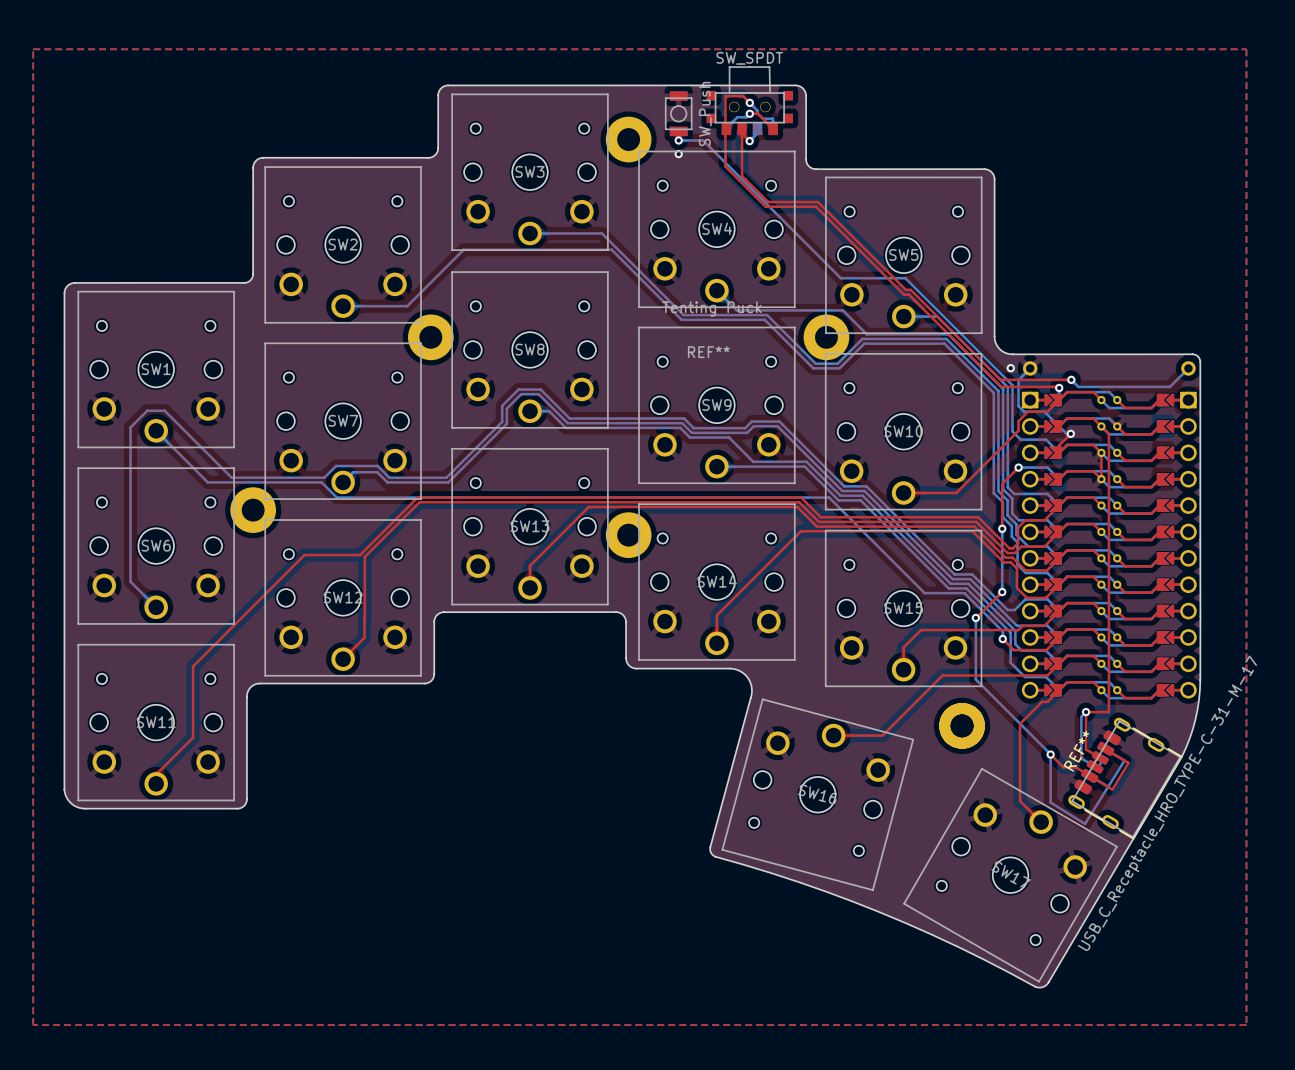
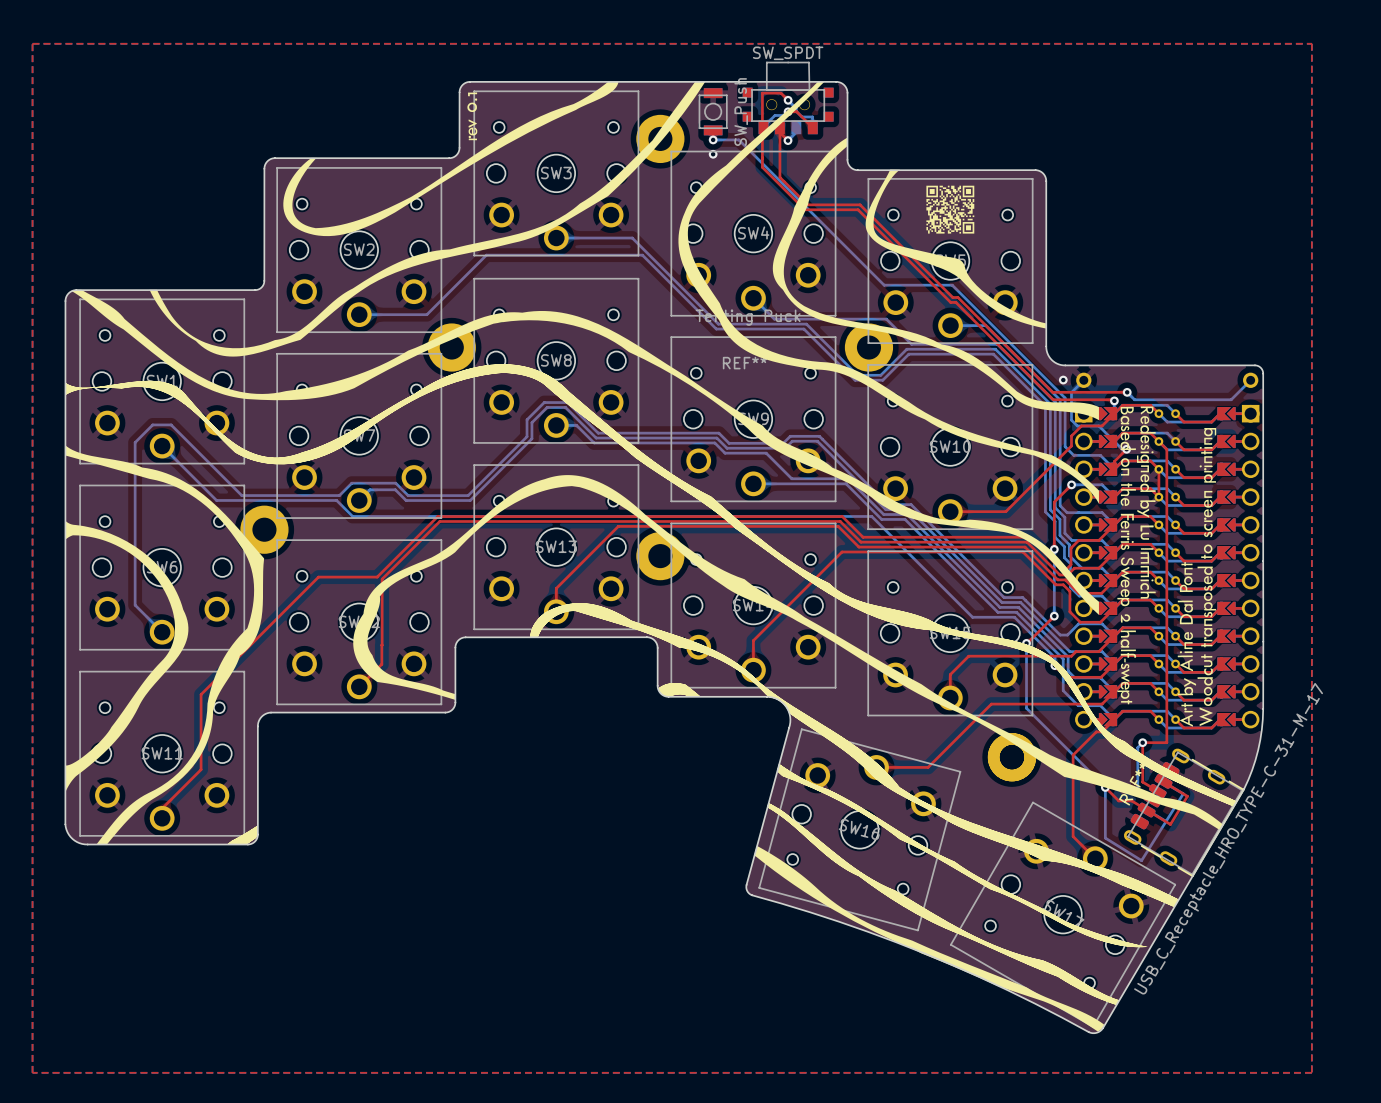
drawing: none -> [65, 81, 1237, 1032]

